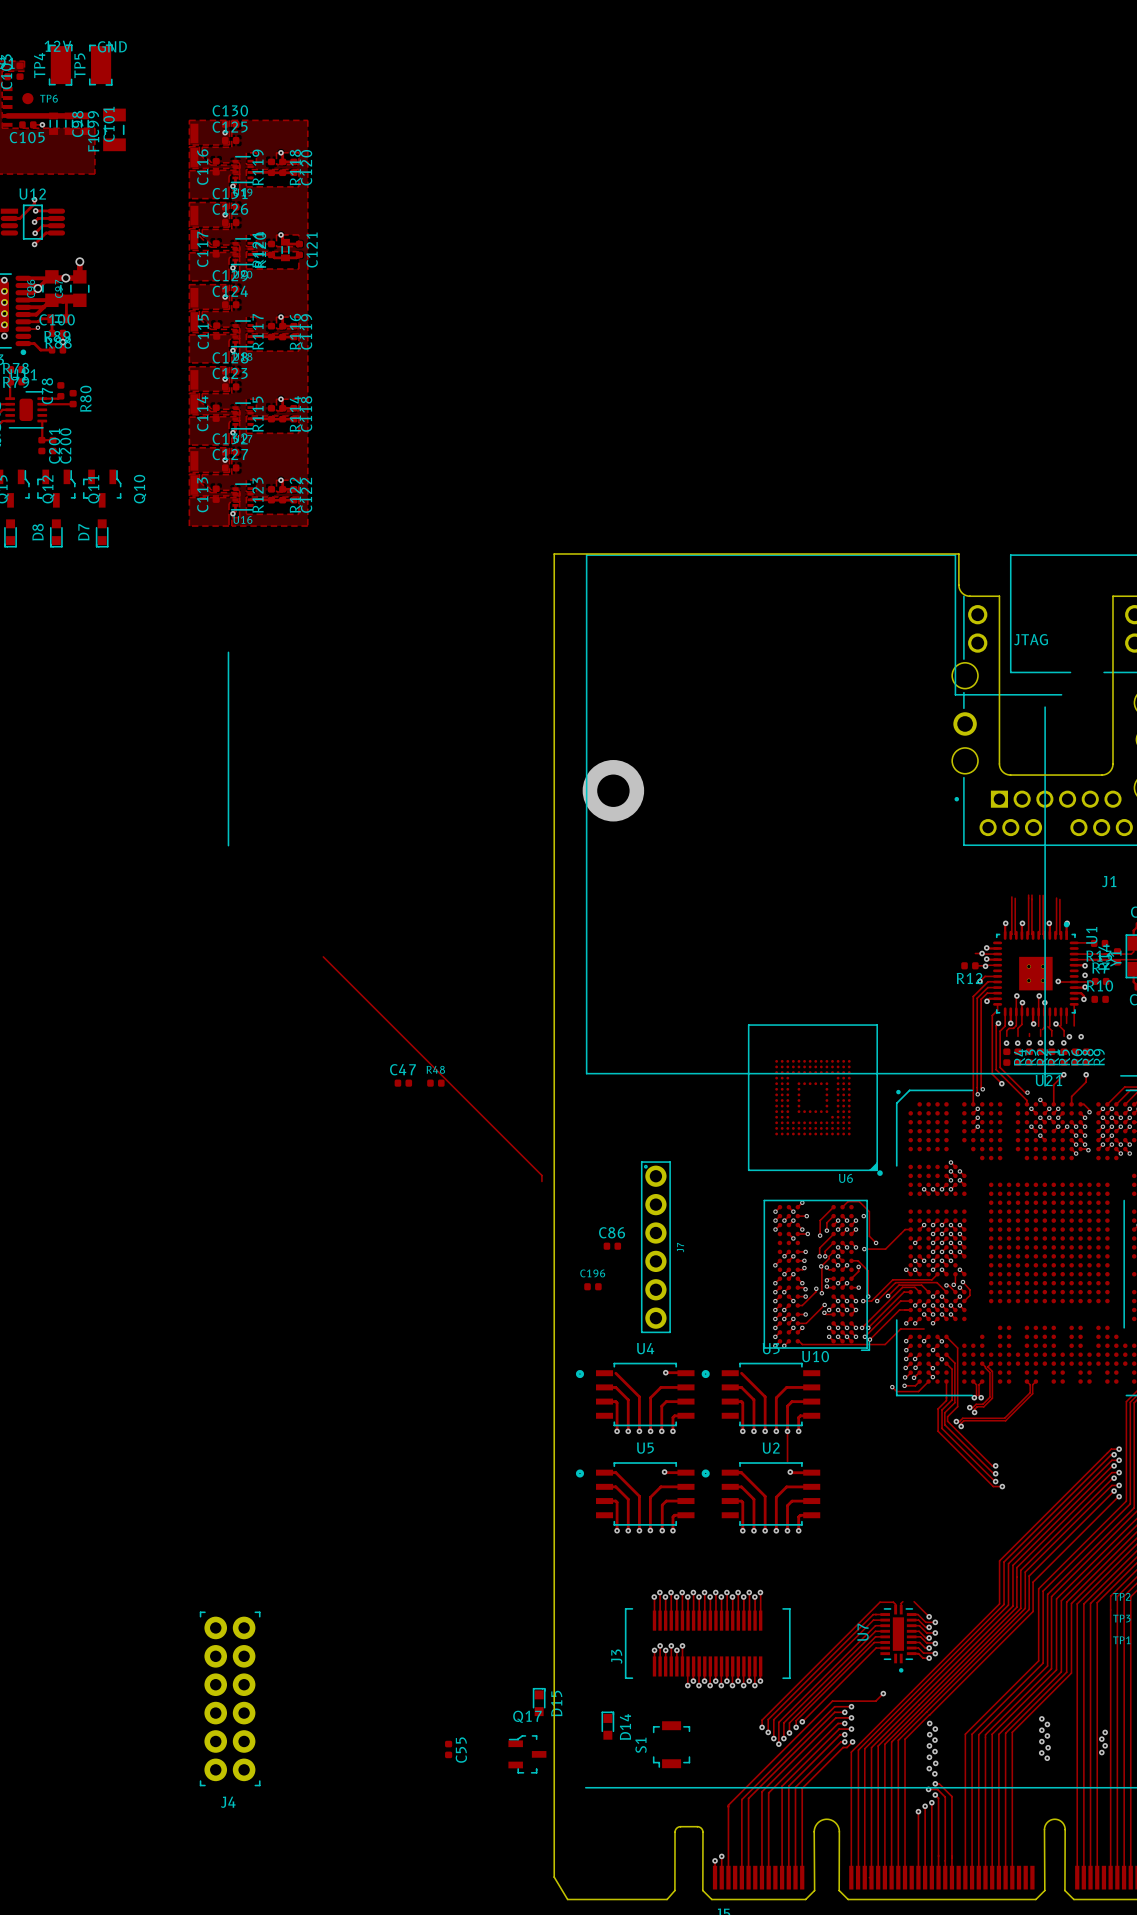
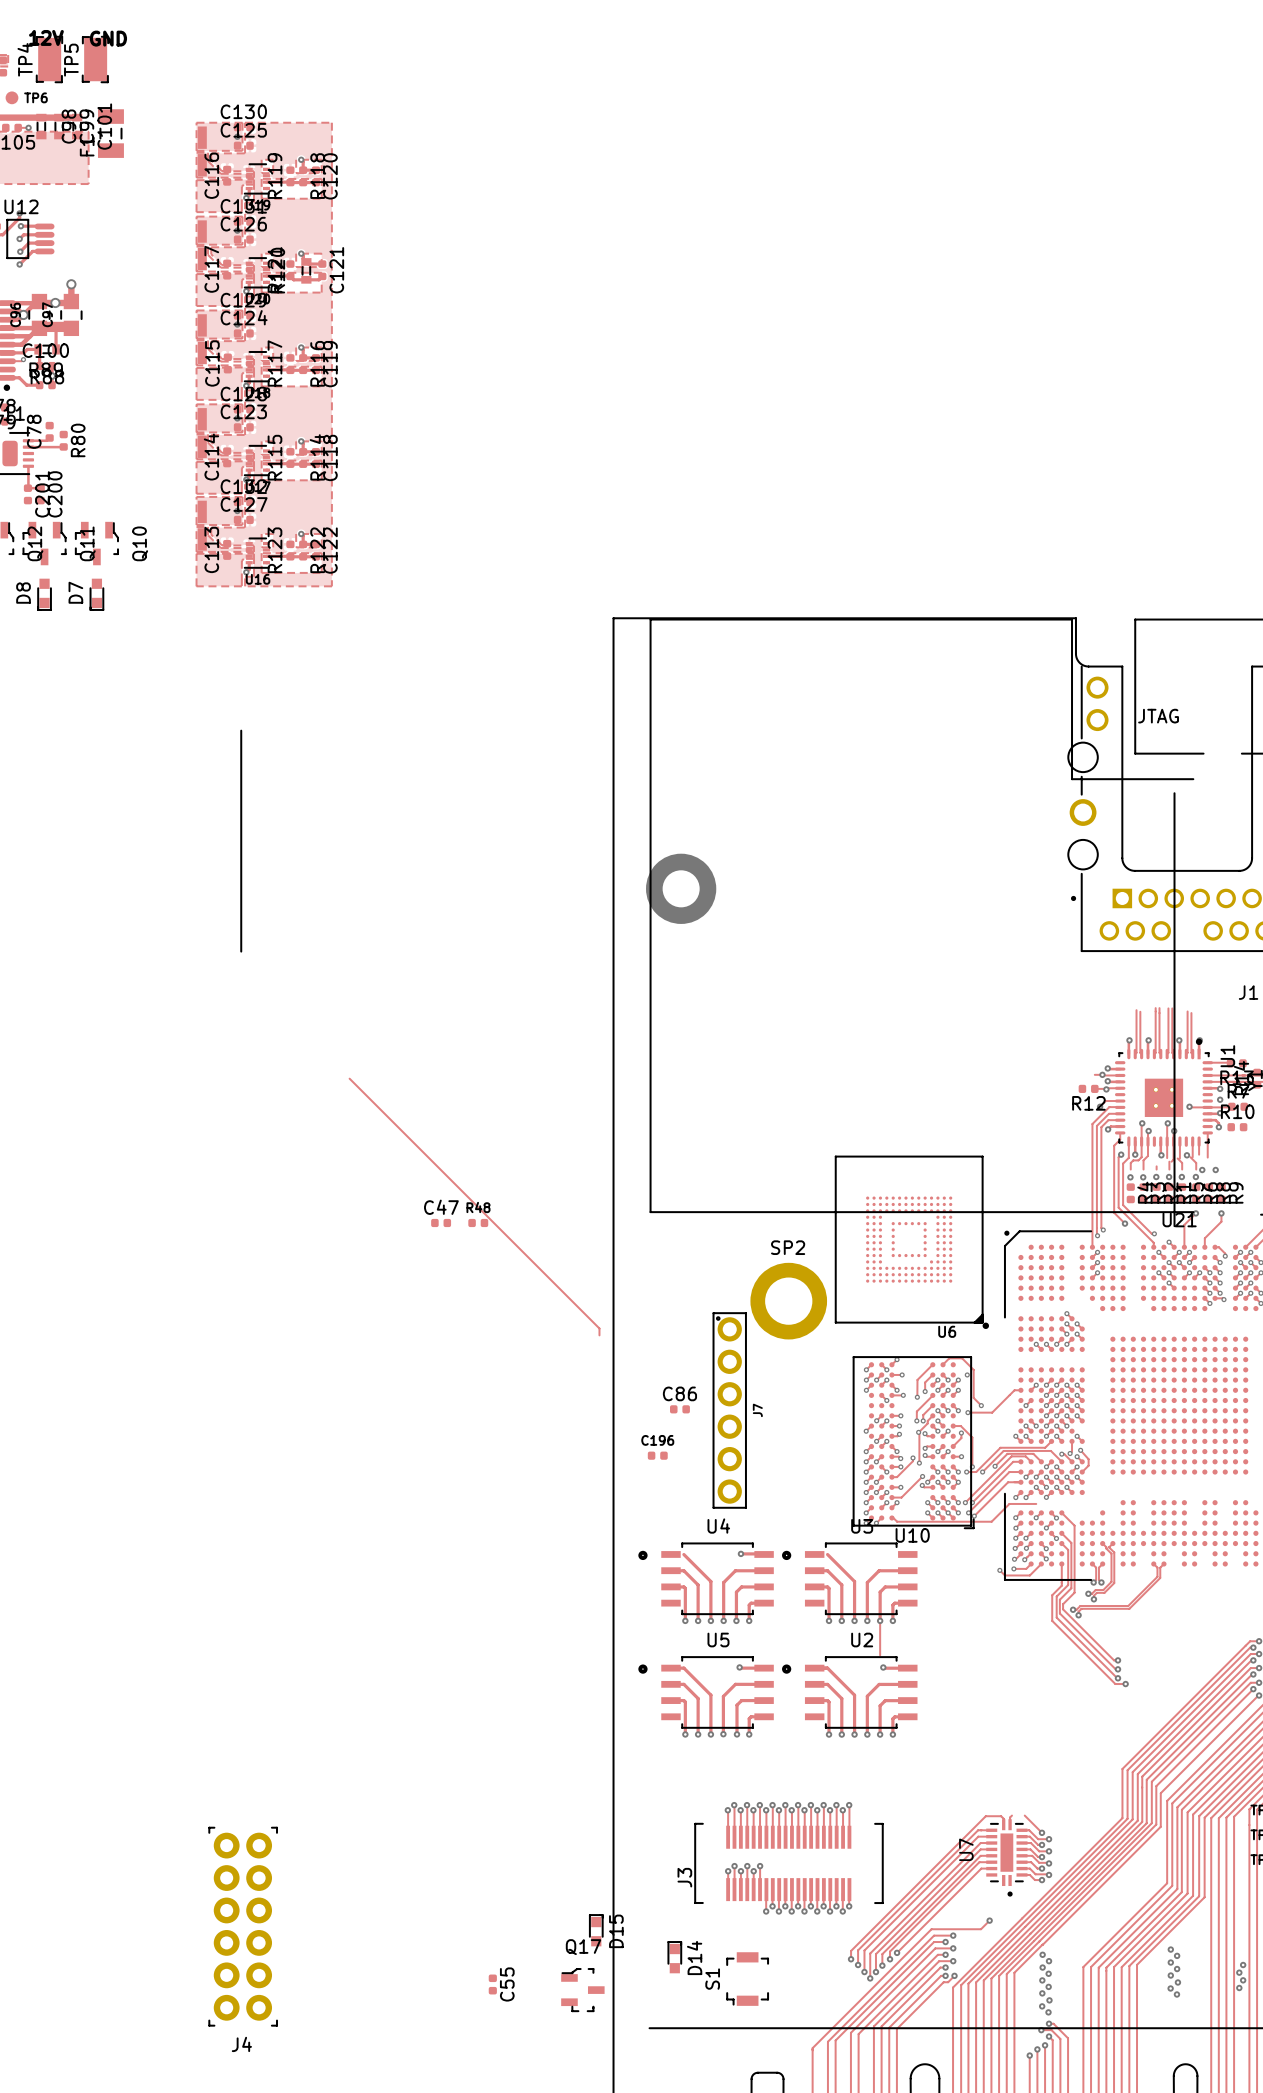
SP2: none -> (788, 1301)

